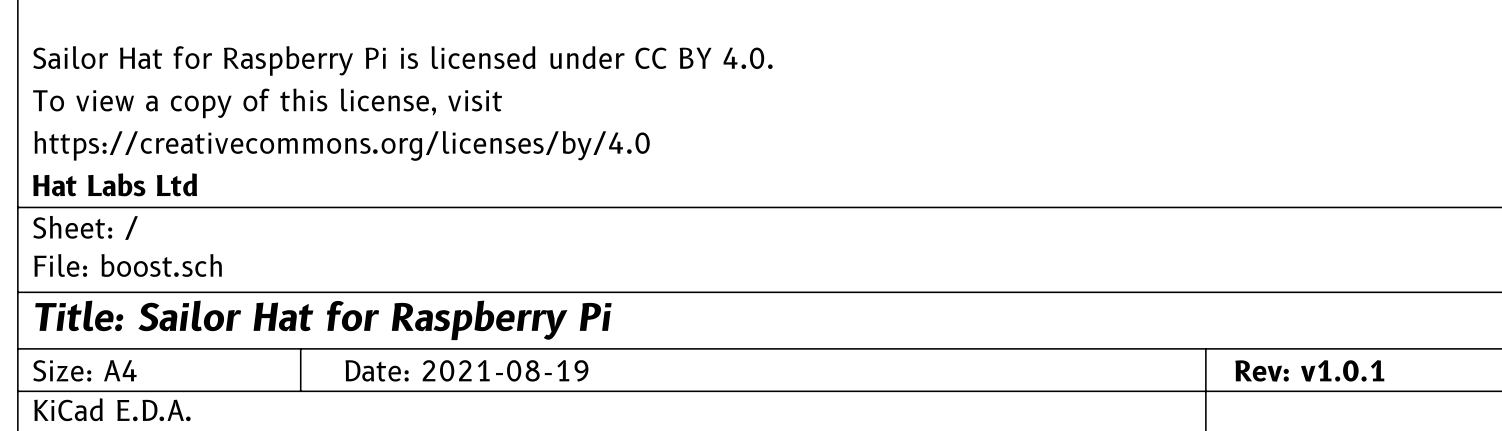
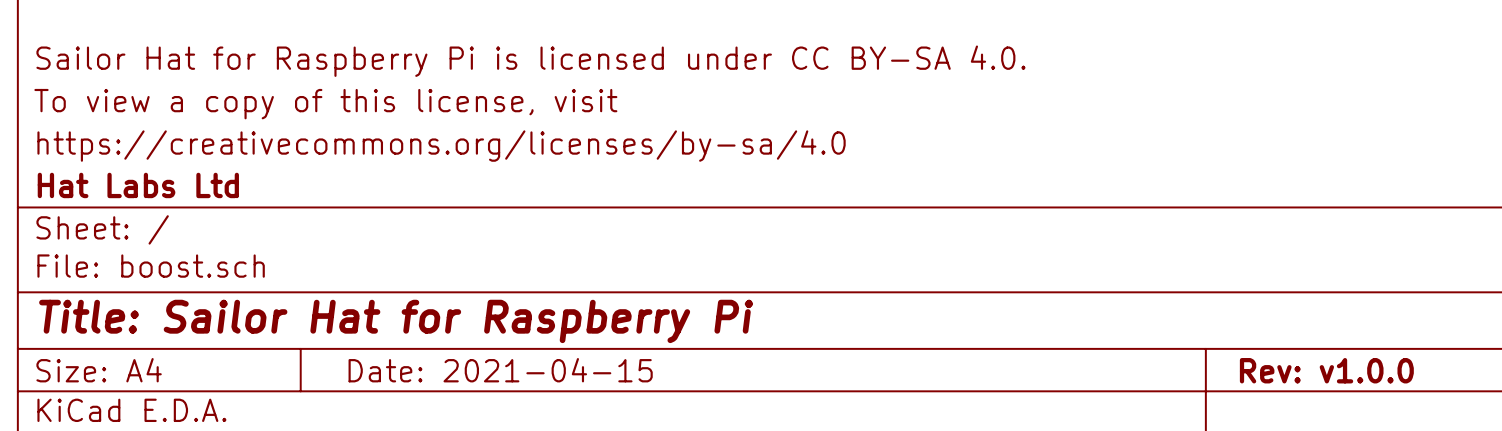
title block: Sailor Hat for Raspberry Pi is licensed under CC BY 4.0. (402, 60) -> Sailor Hat for Raspberry Pi is licensed under CC BY-SA 4.0. (530, 61)
title block: https://creativecommons.org/licenses/by/4.0 (342, 145) -> https://creativecommons.org/licenses/by-sa/4.0 (441, 146)
title block: Date: 2021-08-19 (466, 370) -> Date: 2021-04-15 (500, 370)
title block: Rev: v1.0.1 (1309, 370) -> Rev: v1.0.0 (1326, 370)

